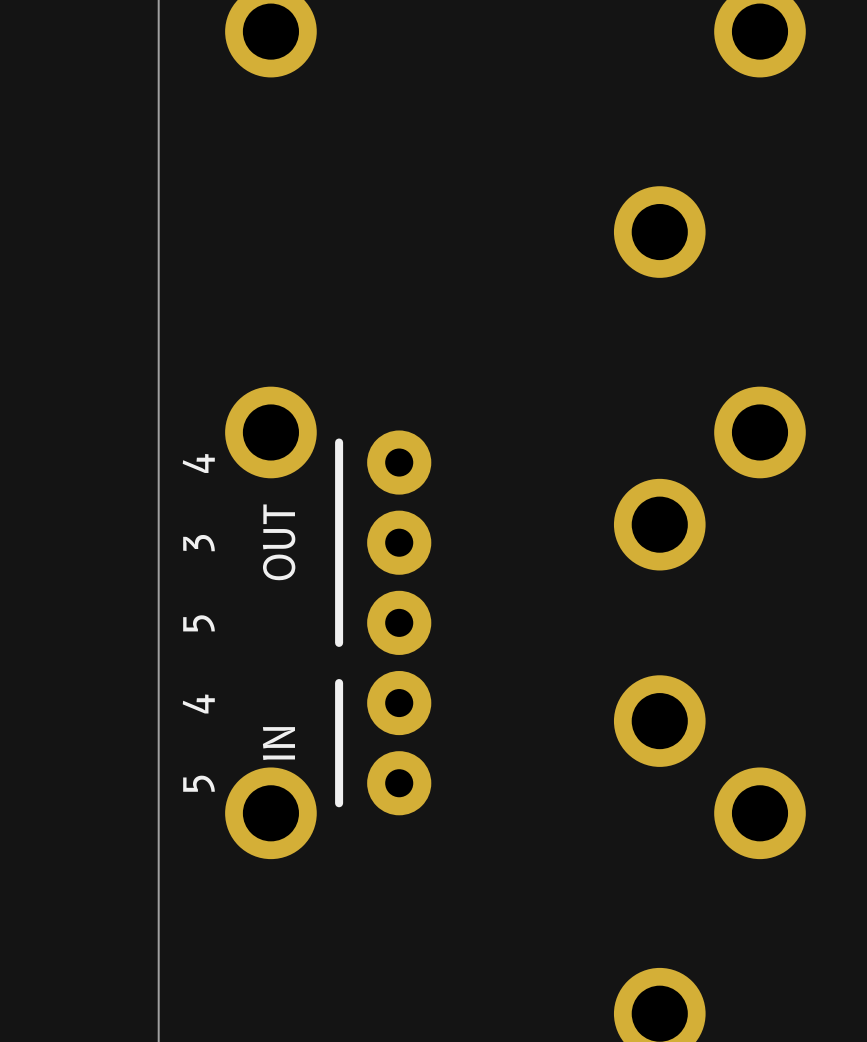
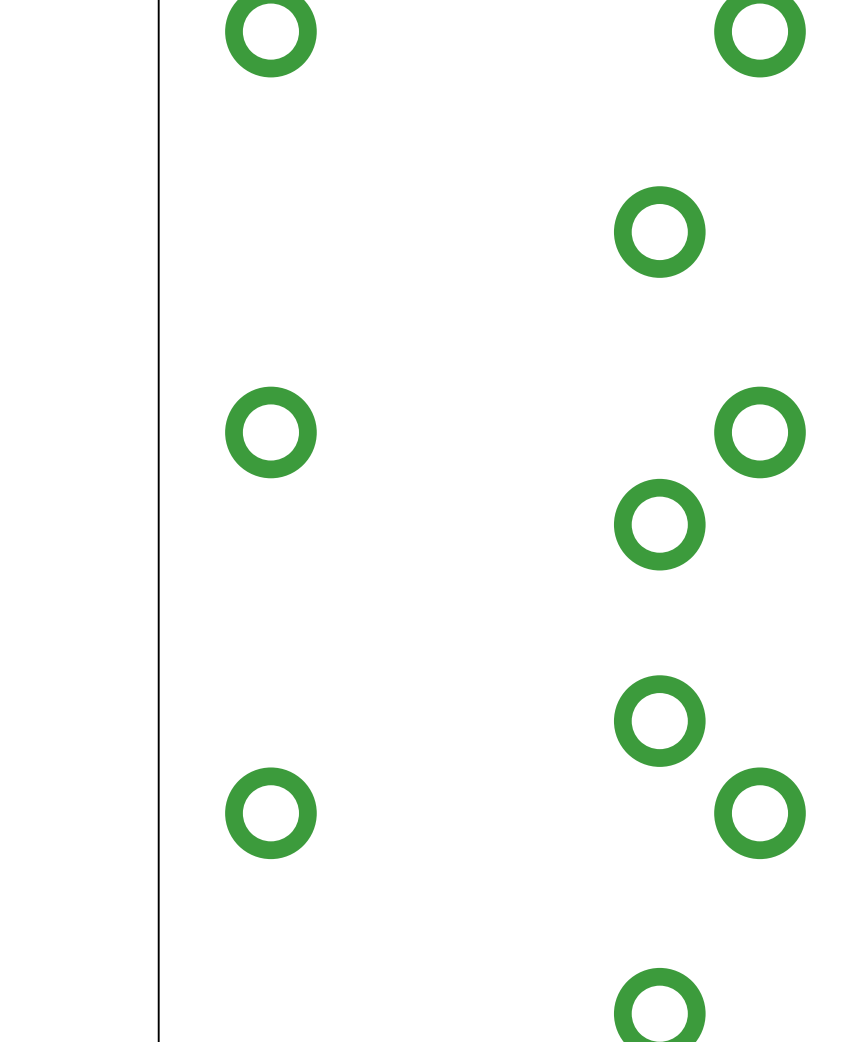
line: (339, 442) (339, 642) -> none
text: 4 (198, 463) -> none
text: OUT (279, 542) -> none
text: 3 (198, 543) -> none
part: (399, 622) -> none
text: 5 (198, 623) -> none
line: (339, 683) (339, 803) -> none
text: 4 (198, 704) -> none
text: IN (278, 743) -> none
text: 5 (198, 783) -> none

